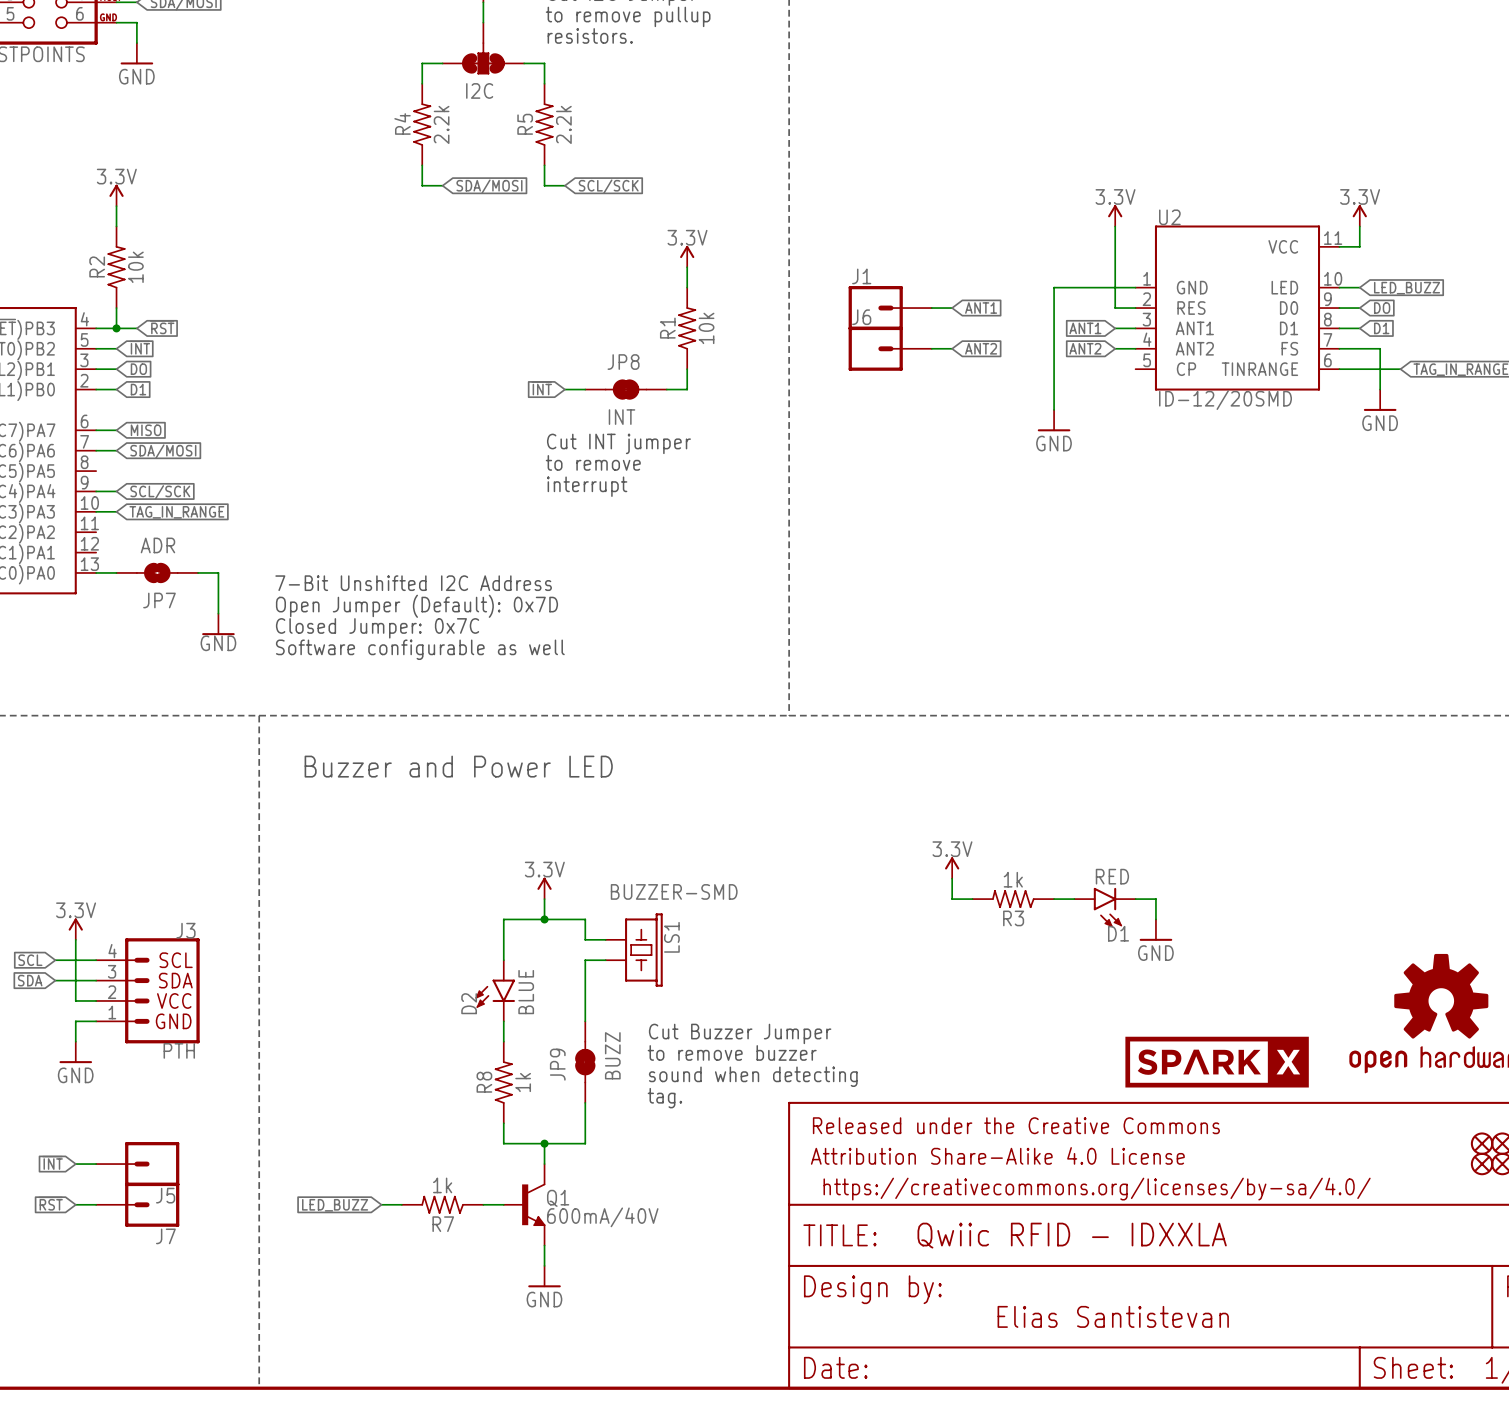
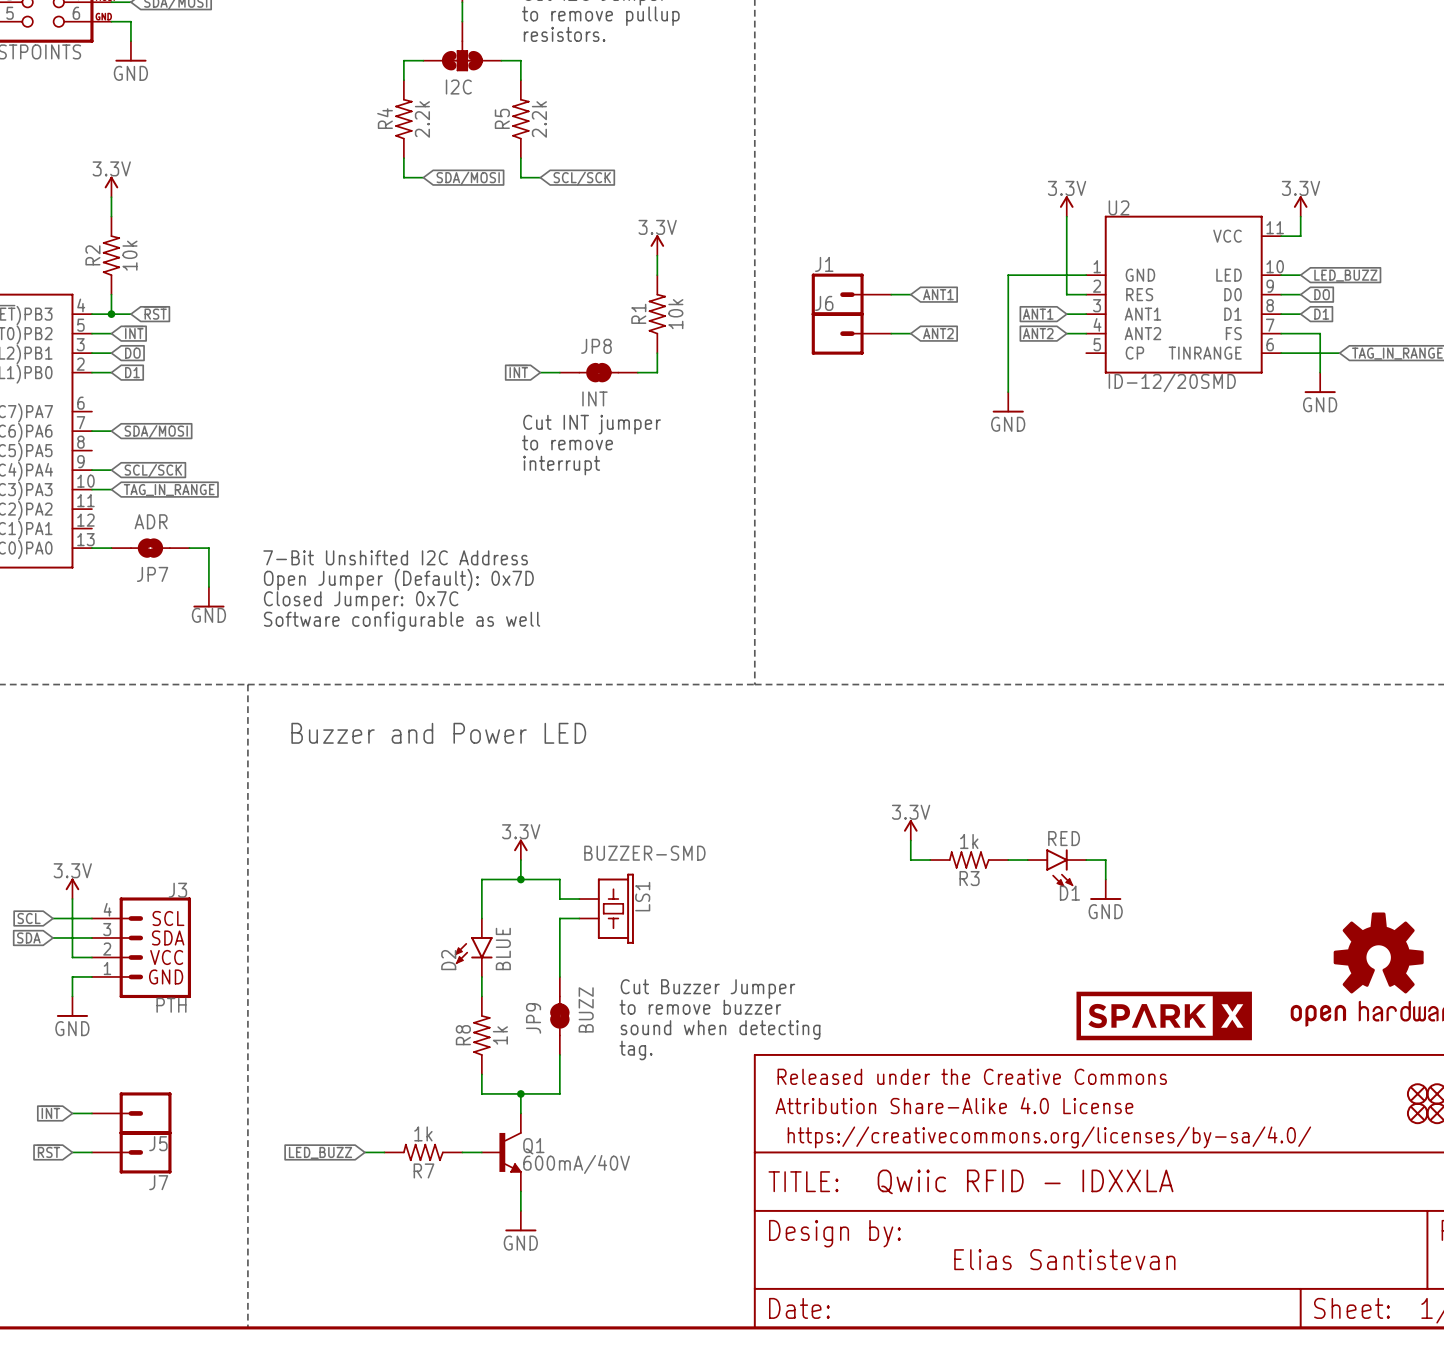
wire: (96, 430) (116, 430) -> none
global label: MISO (146, 430) -> none

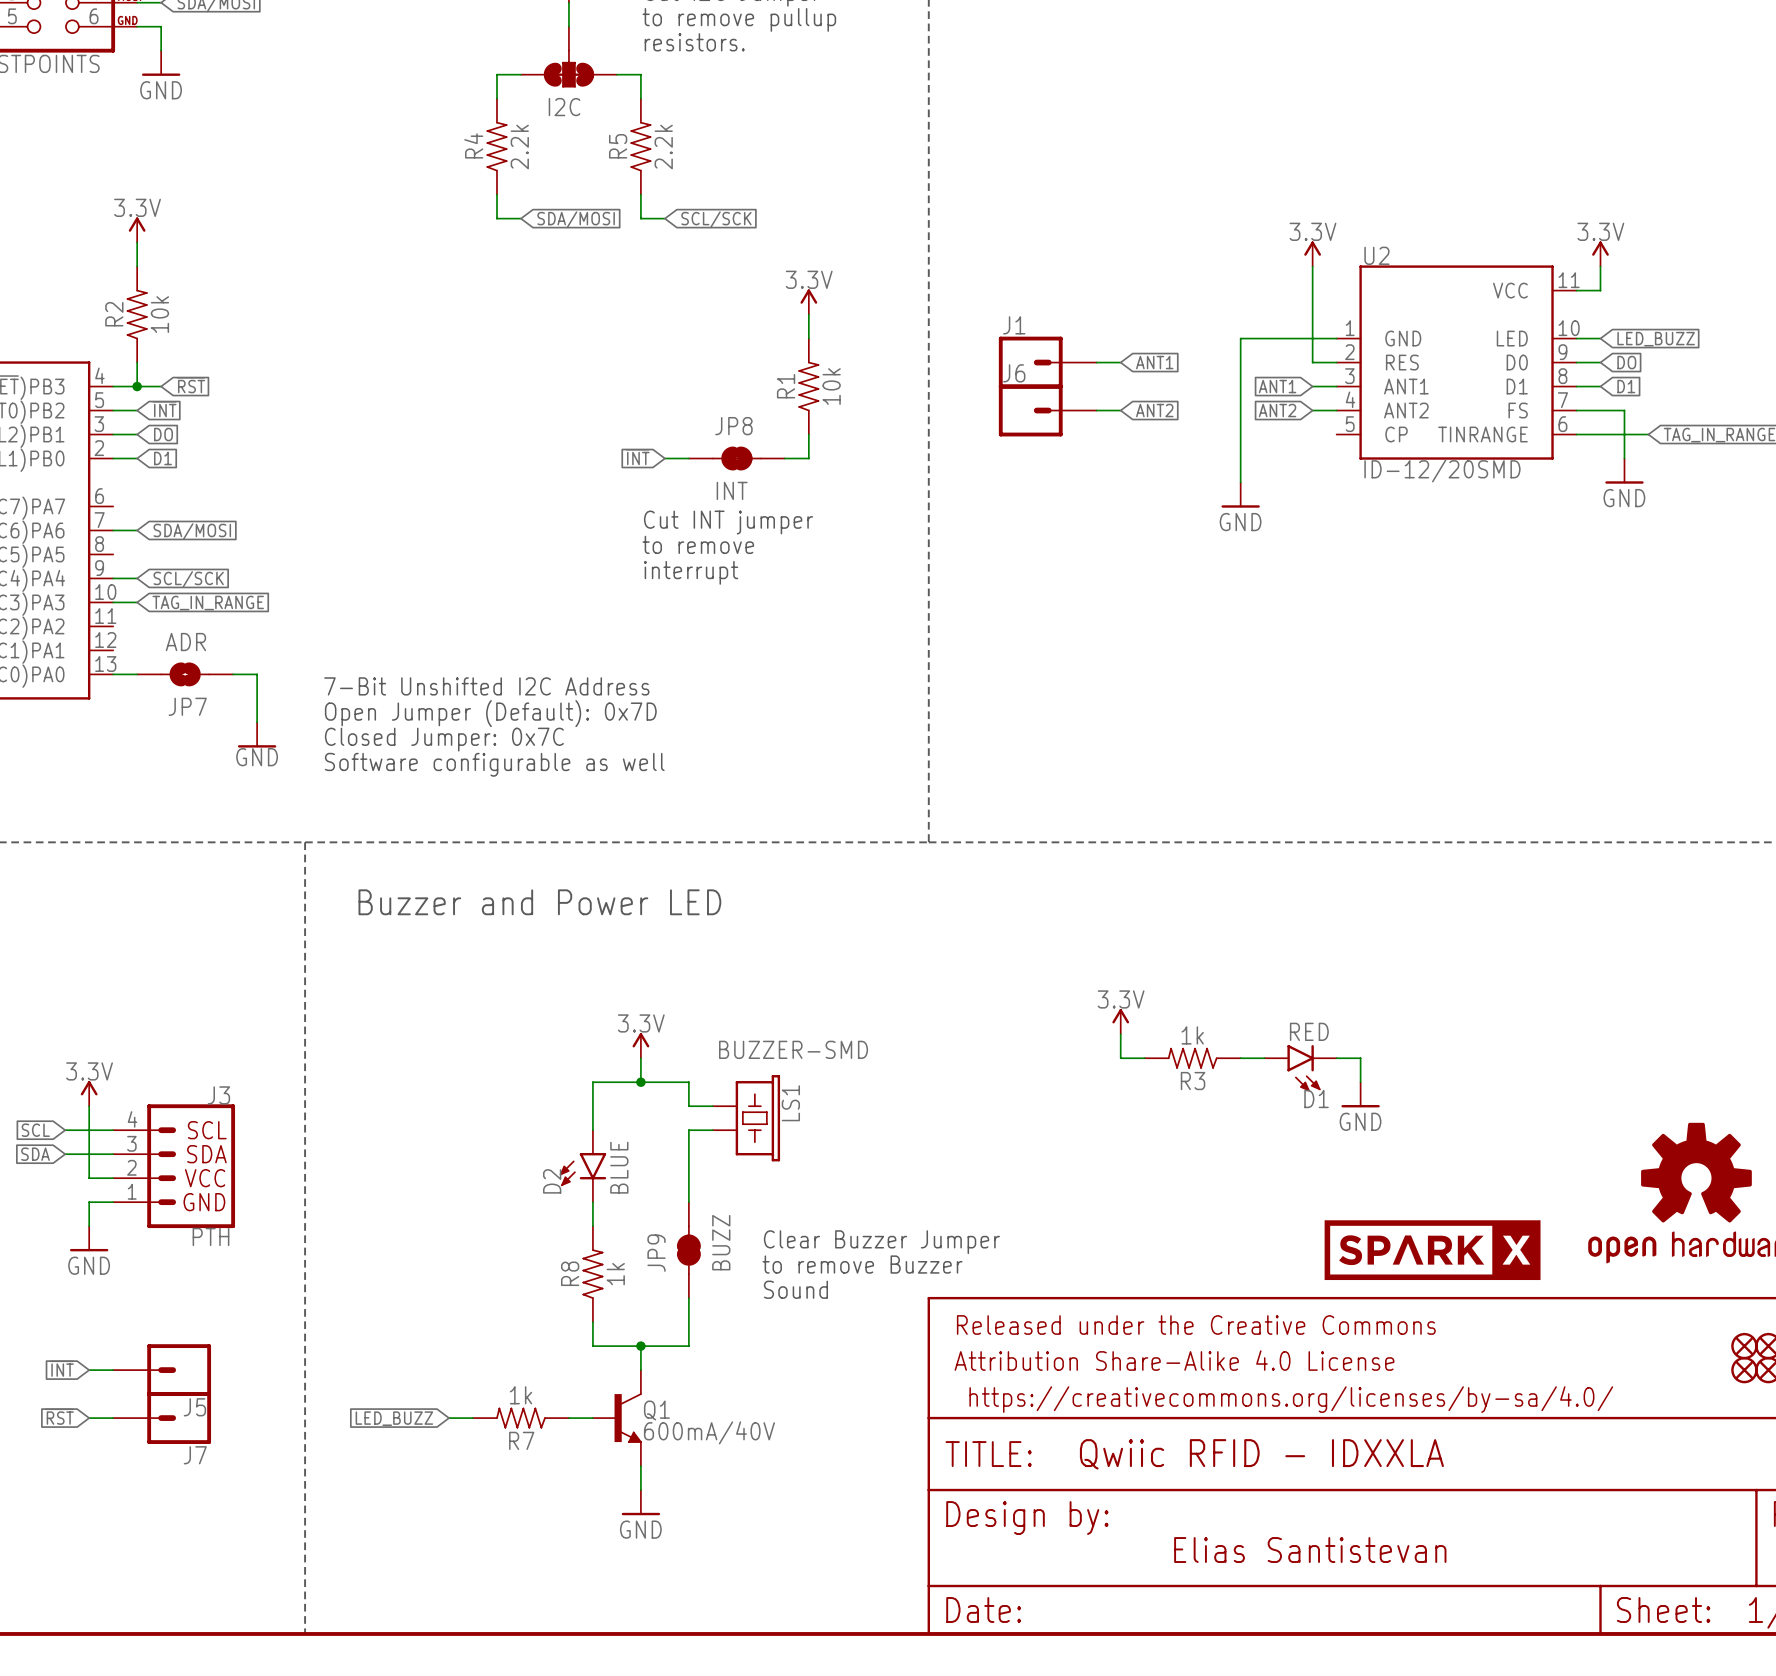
text: Cut Buzzer Jumper (707, 989) -> none
text: to remove buzzer (700, 1007) -> Clear Buzzer Jumper (881, 1242)
text: sound when detecting (720, 1029) -> to remove Buzzer (862, 1264)
text: tag. (636, 1050) -> Sound (795, 1289)

